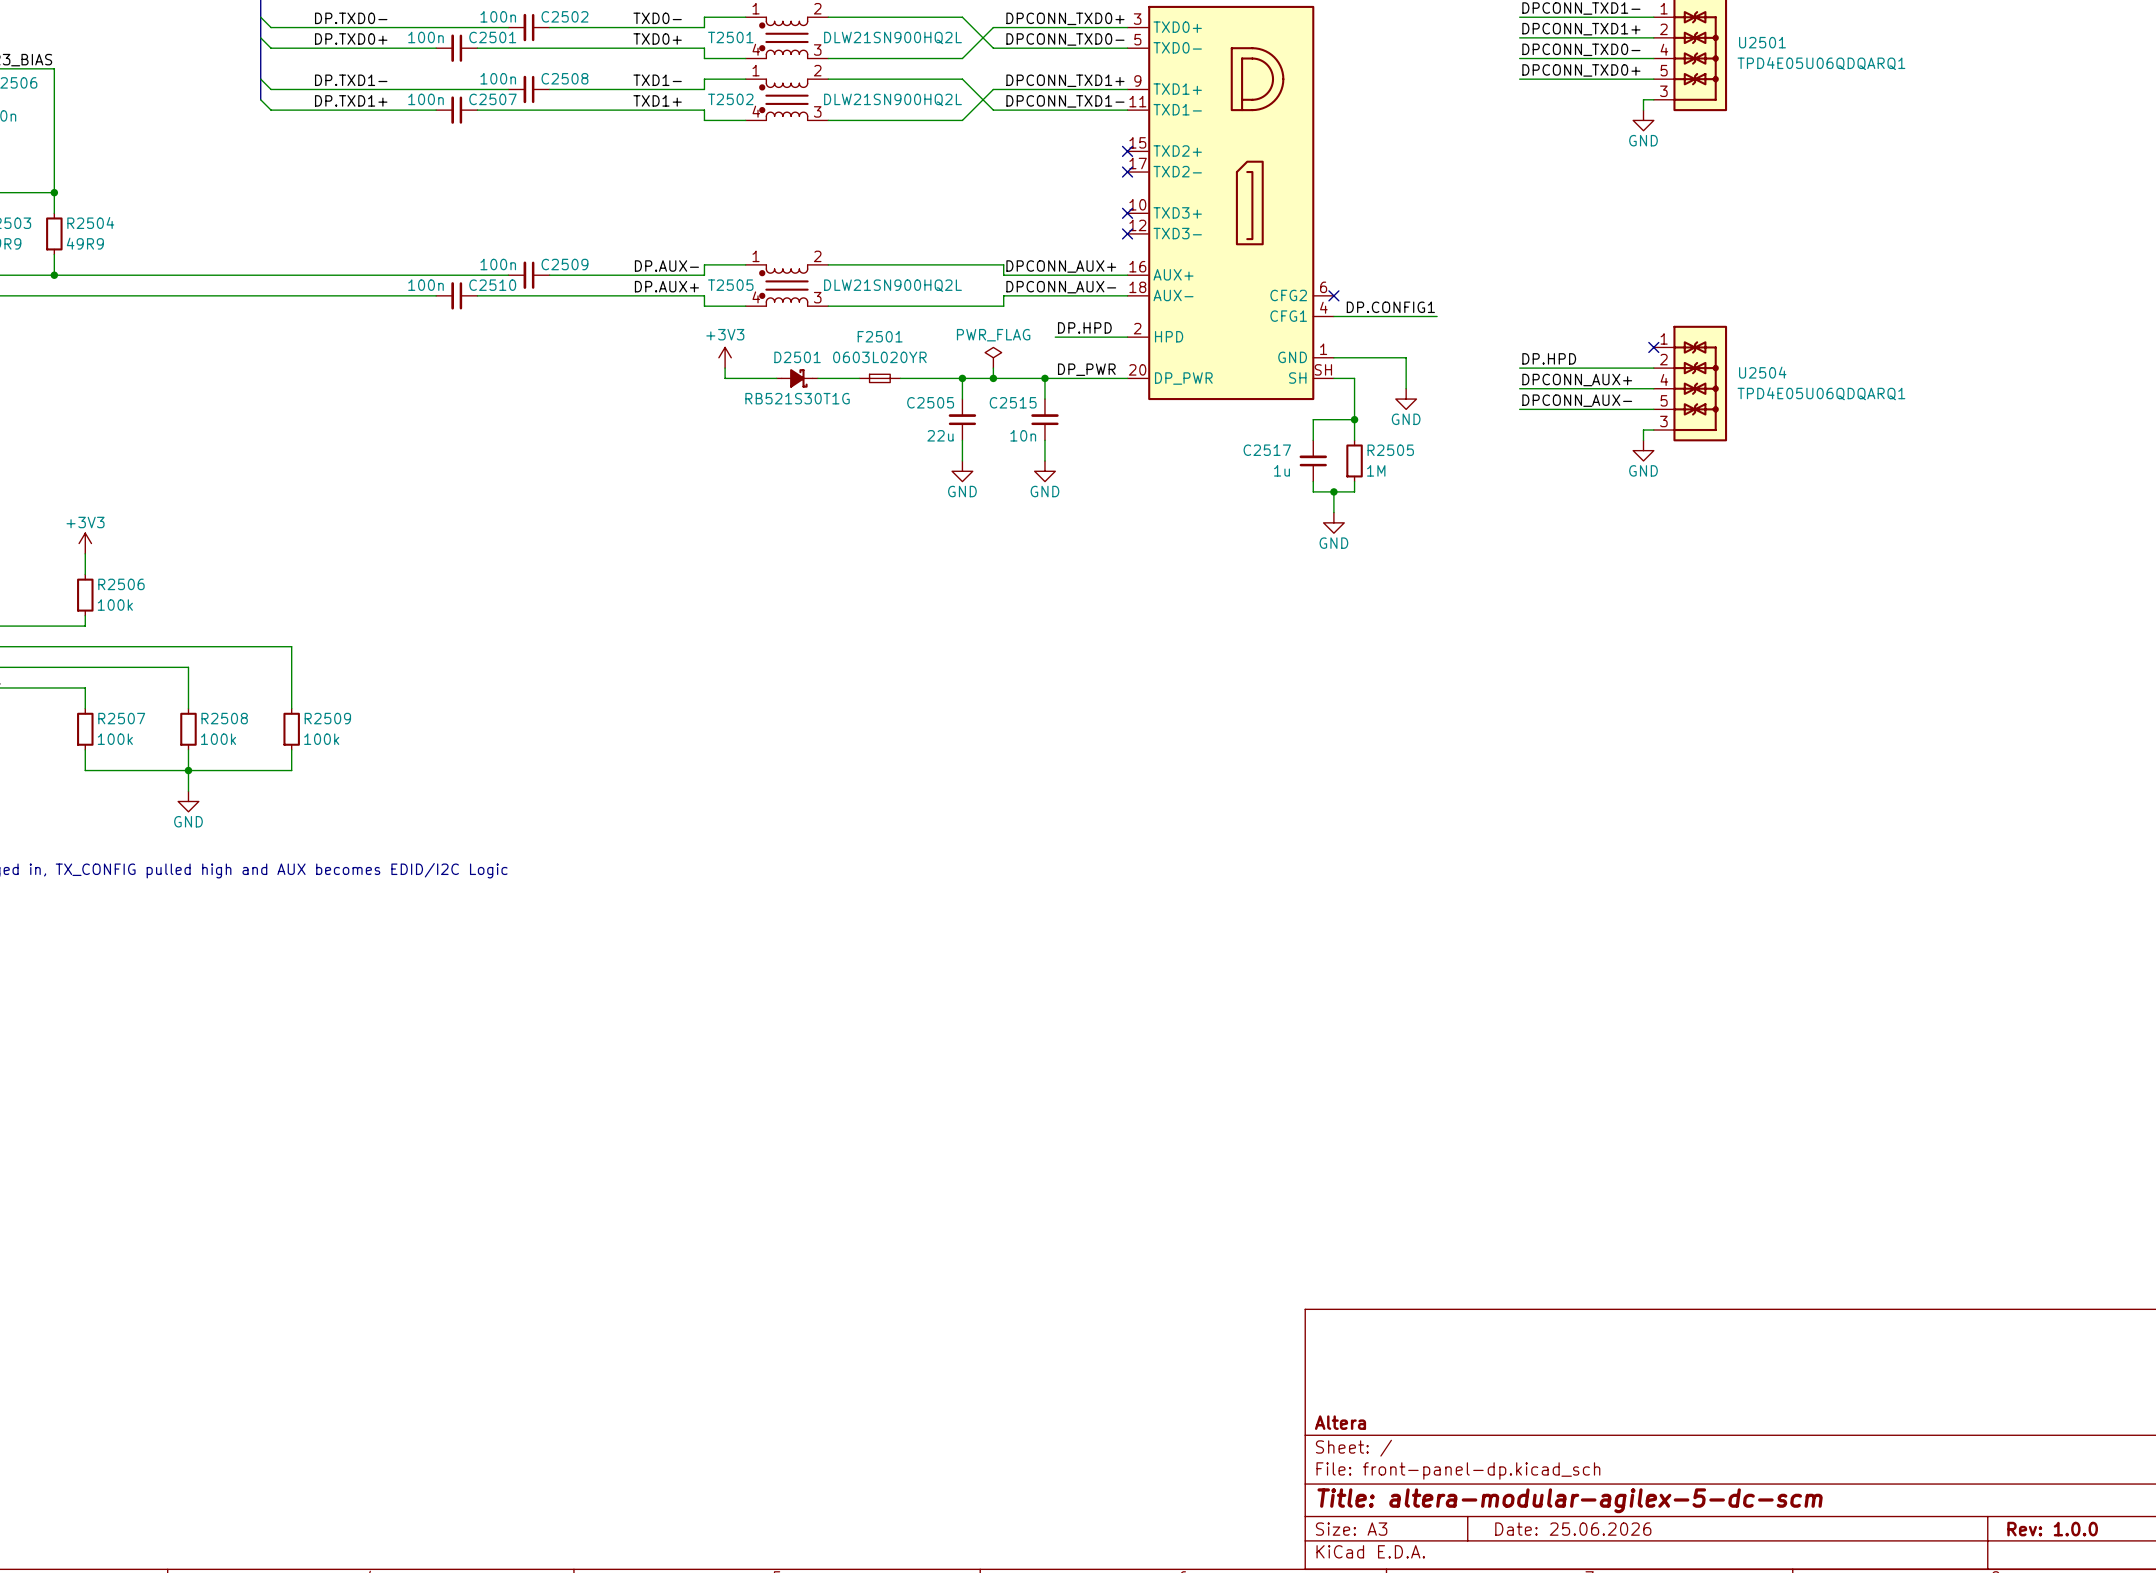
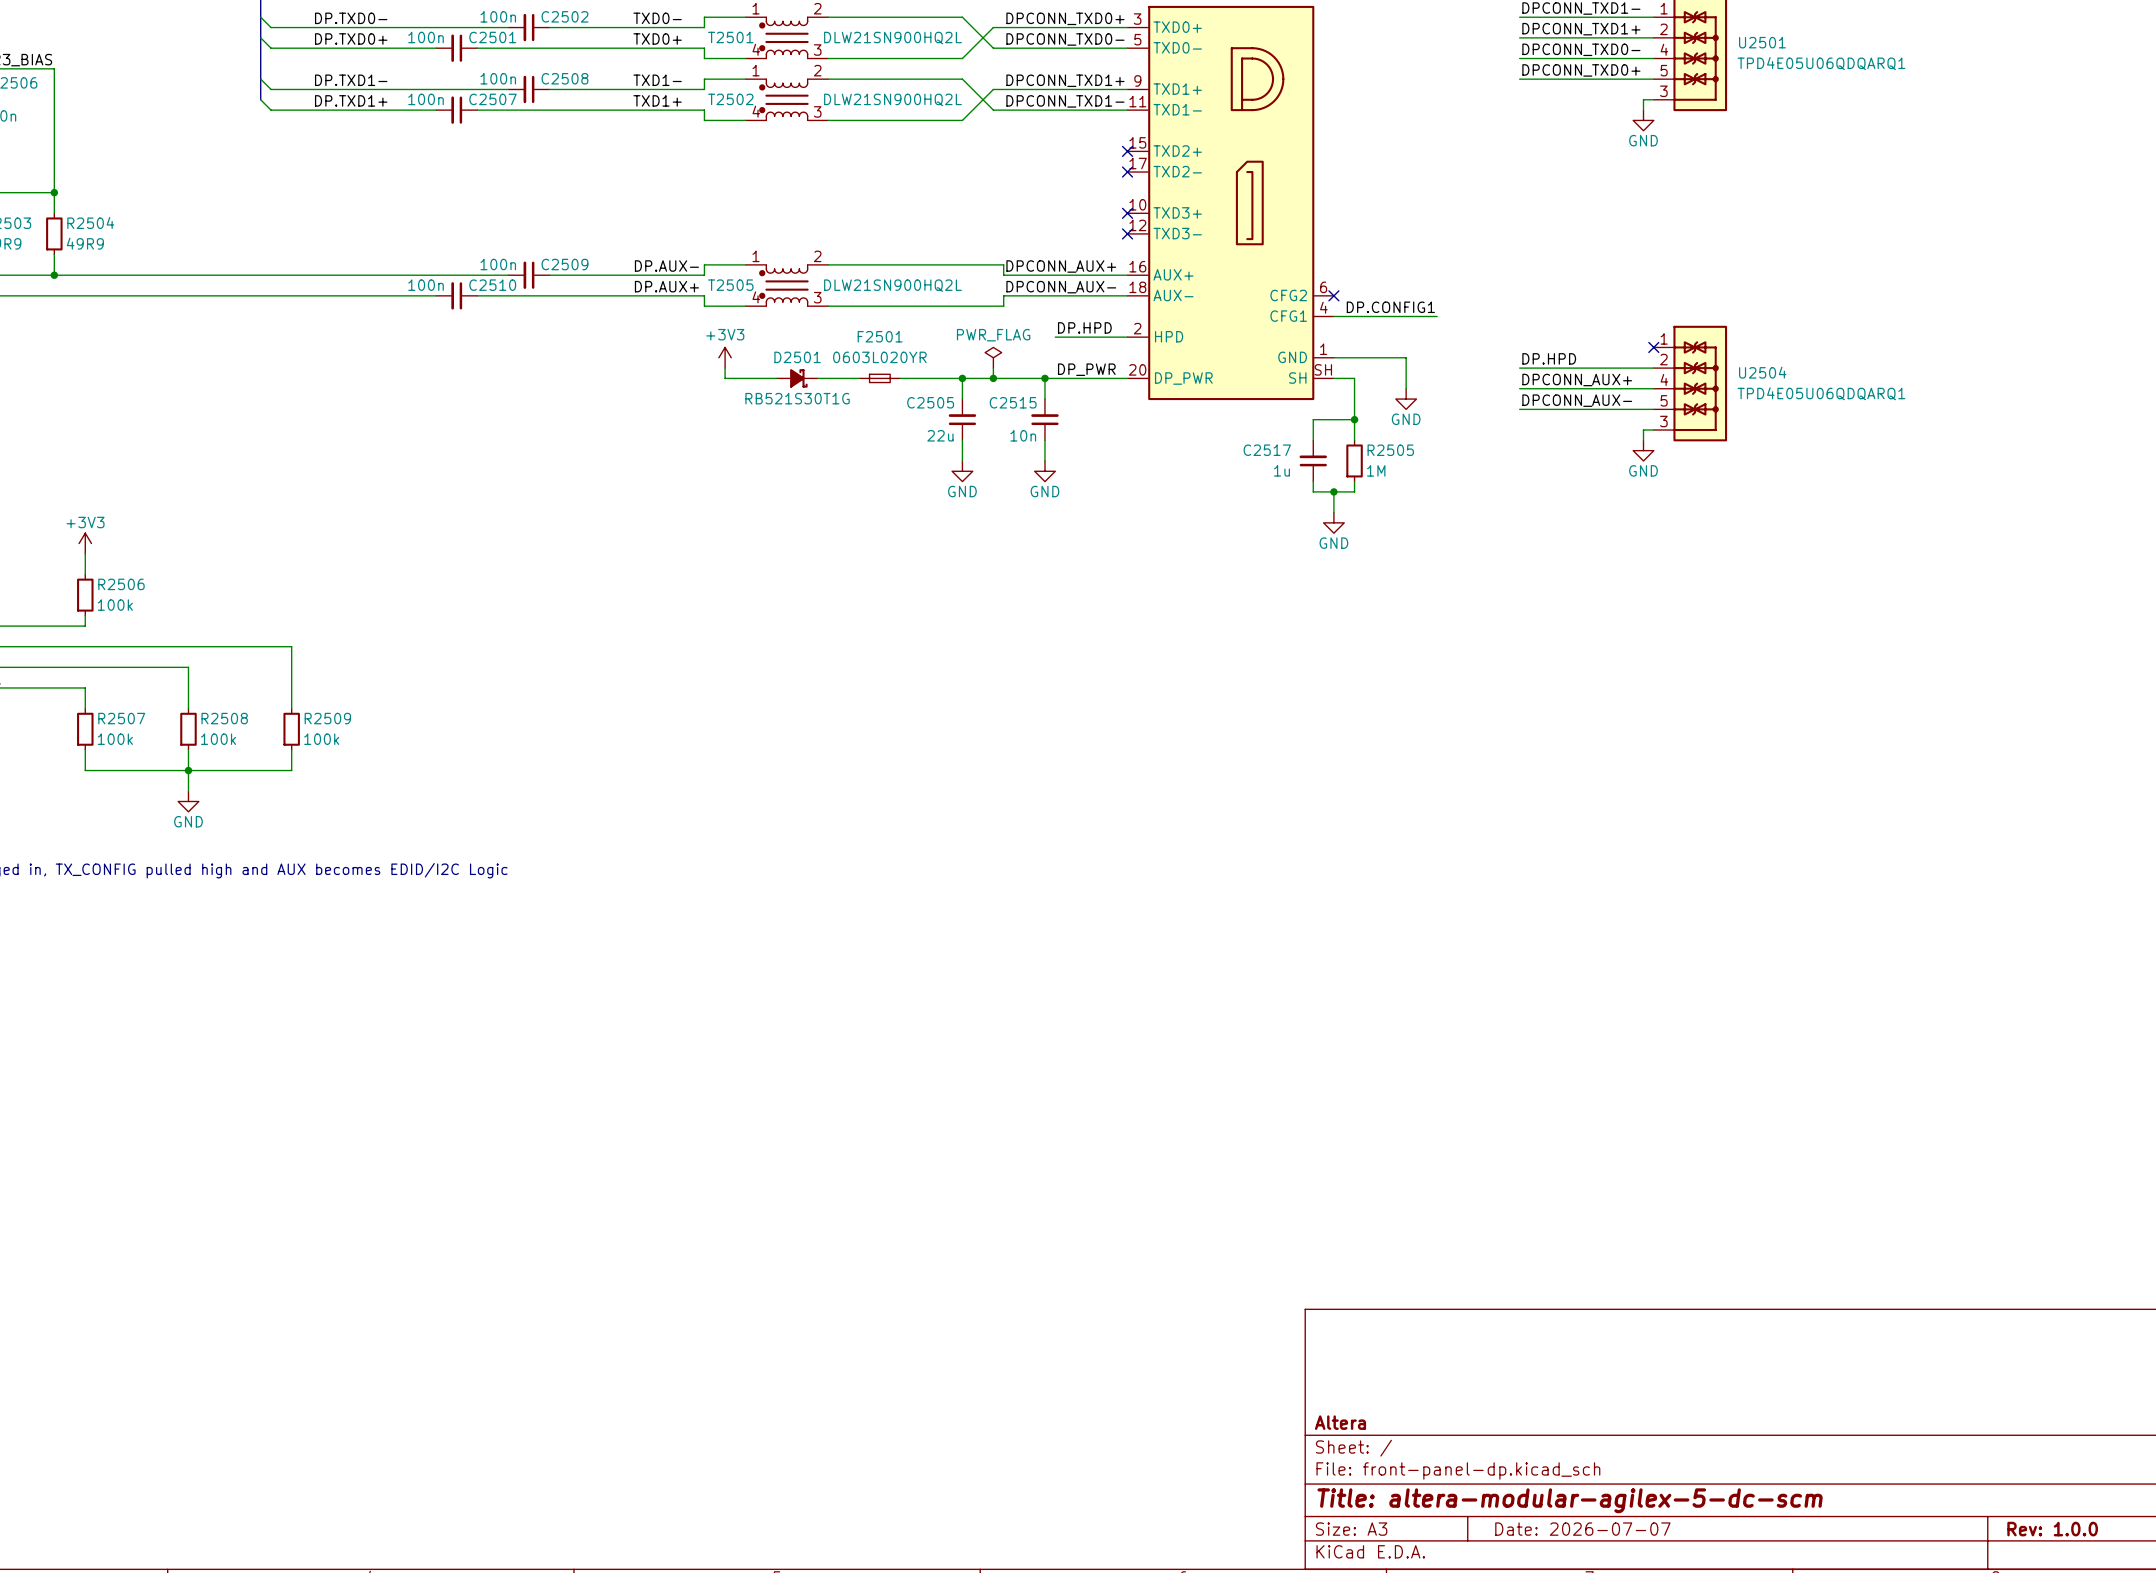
title block: Date: 25.06.2026 (1573, 1529) -> Date: 2026-07-07 (1582, 1529)

